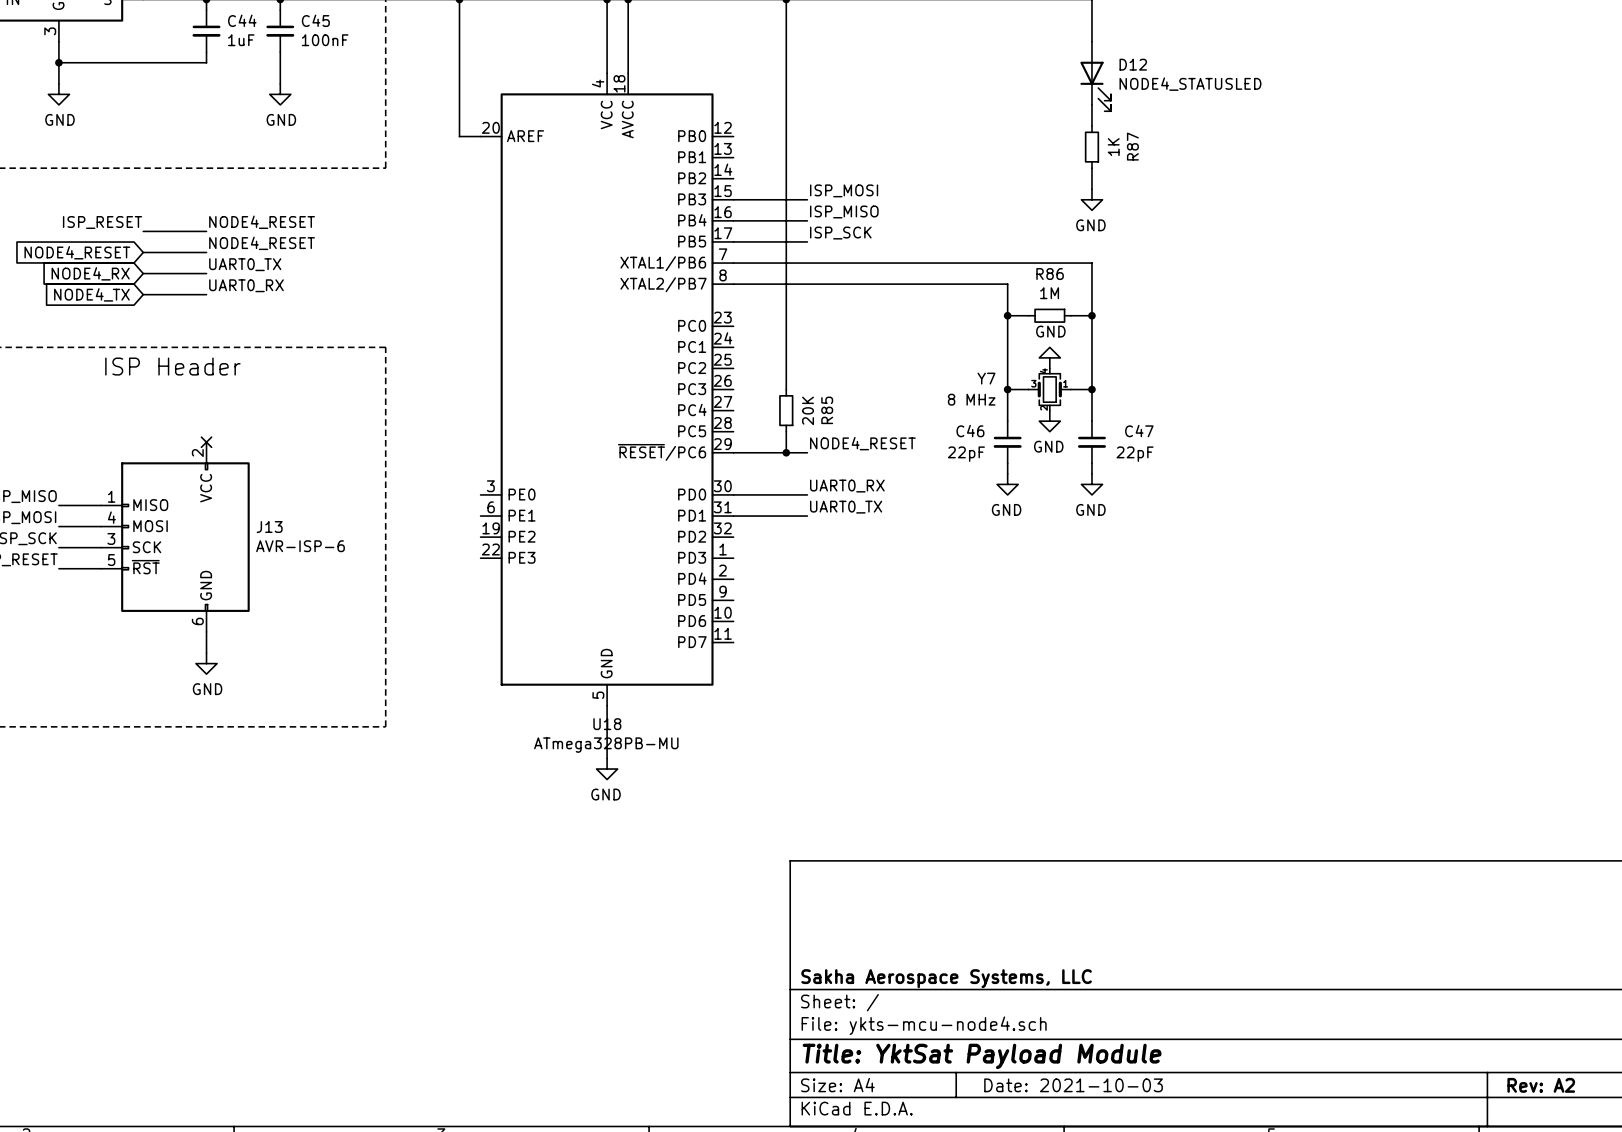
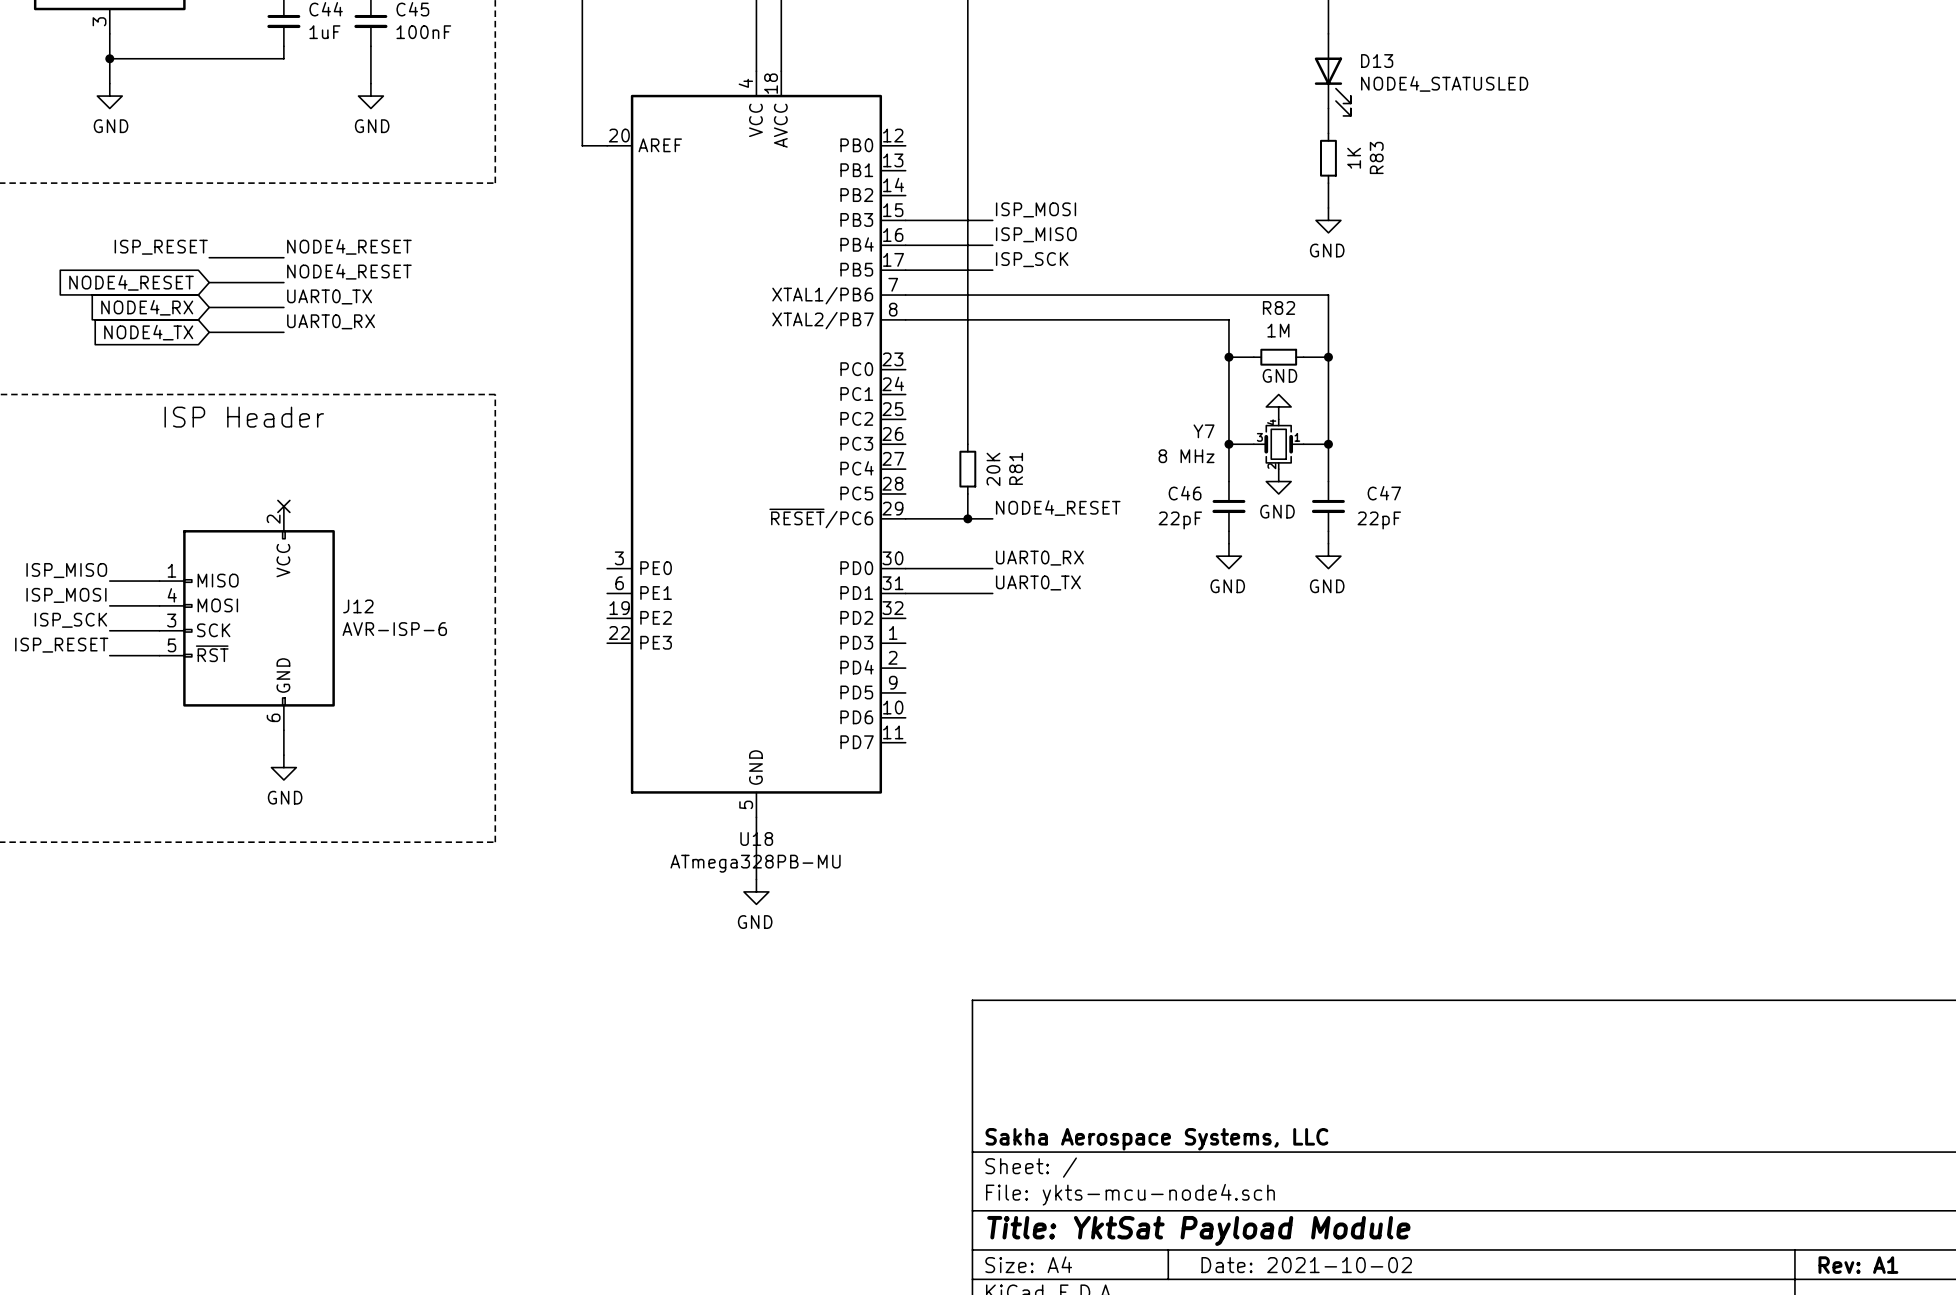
D12 name: D12 (1133, 64) -> D13 (1377, 61)
R87 name: R87 (1132, 146) -> R83 (1376, 157)
R86 name: R86 (1050, 274) -> R82 (1279, 307)
R85 name: R85 (827, 410) -> R81 (1016, 468)
J13 name: J13 (269, 527) -> J12 (358, 606)
title block: Date: 2021-10-03 (1073, 1085) -> Date: 2021-10-02 (1306, 1265)
title block: Rev: A2 (1541, 1085) -> Rev: A1 (1858, 1265)

